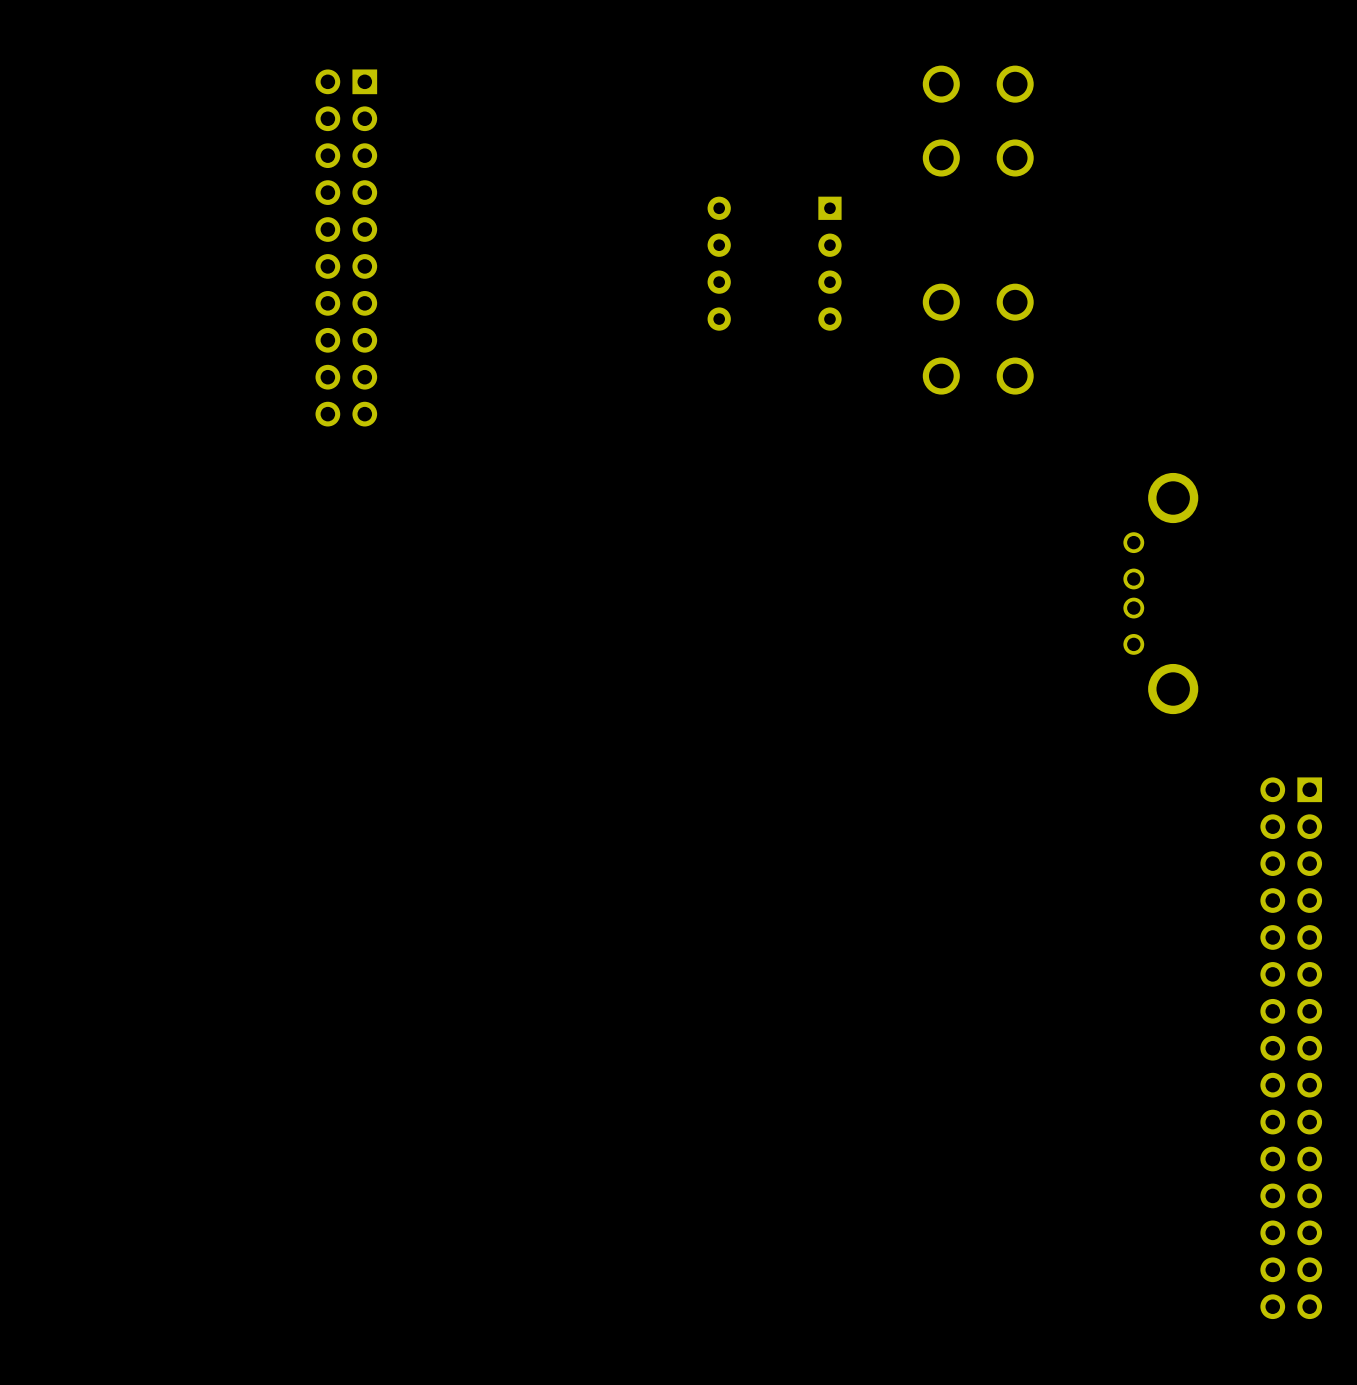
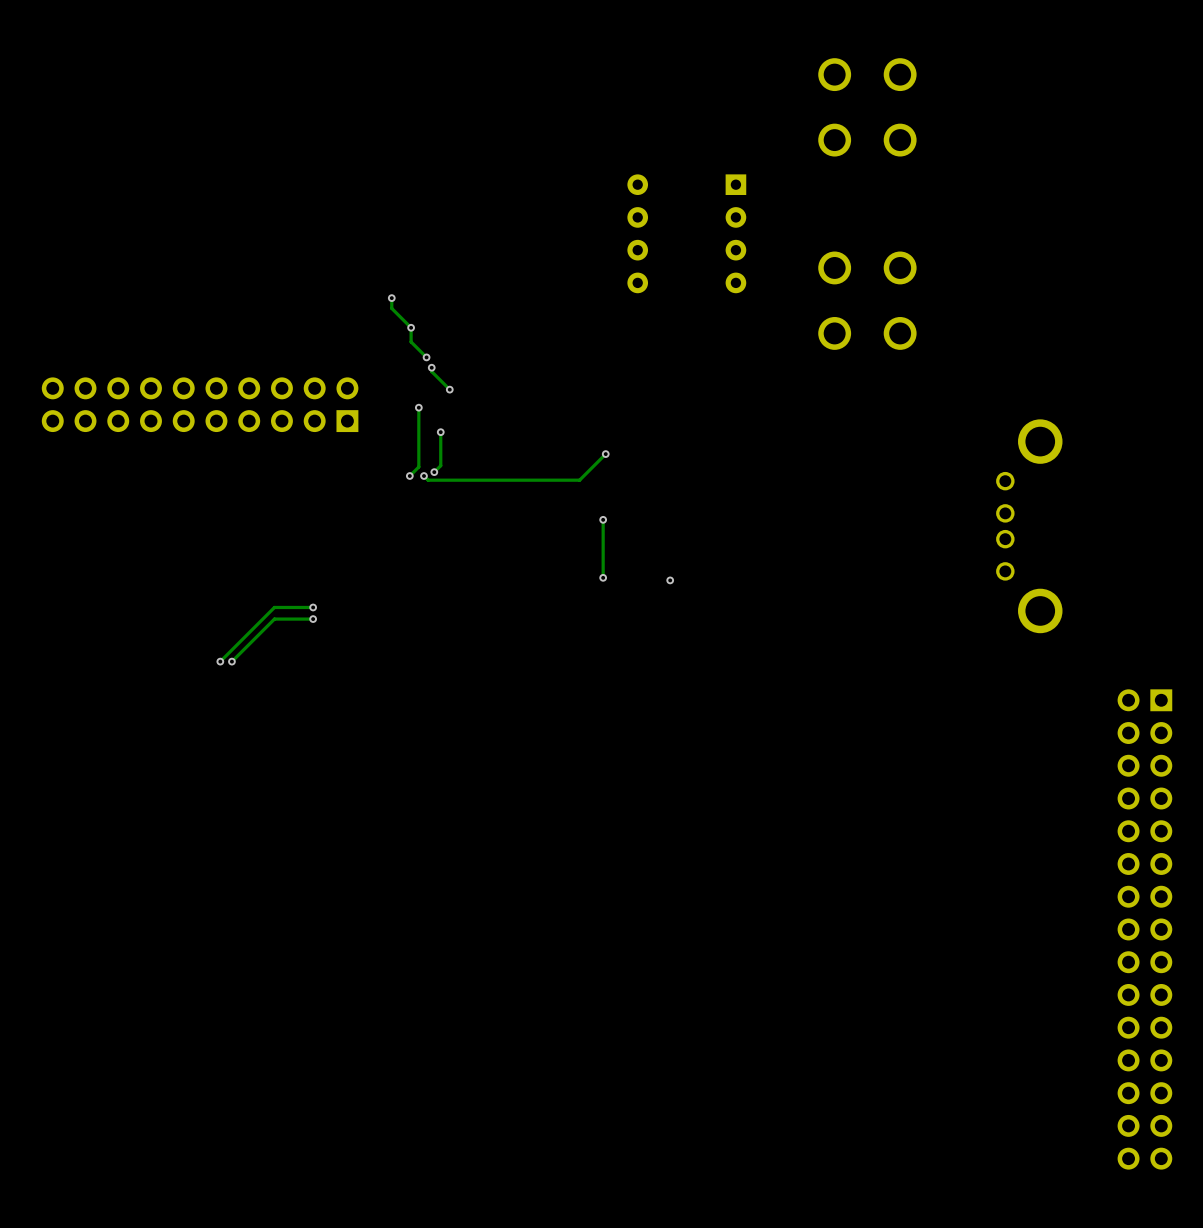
part rotation: 0° (346, 247) -> 90° clockwise (200, 404)
part position: (346, 247) -> (200, 404)
track: none -> (391, 298) (391, 308) (411, 327) (411, 341) (426, 357)
via: none -> (391, 298)
via: none -> (411, 327)
via: none -> (426, 357)
track: none -> (431, 367) (431, 371) (449, 389)
via: none -> (431, 367)
via: none -> (449, 389)
track: none -> (418, 407) (418, 466) (409, 476)
via: none -> (418, 407)
track: none -> (440, 432) (440, 465) (434, 472)
via: none -> (440, 432)
track: none -> (605, 454) (579, 480) (428, 480) (423, 476)
via: none -> (605, 454)
via: none -> (434, 472)
via: none -> (409, 476)
via: none -> (423, 476)
track: none -> (603, 519) (603, 577)
via: none -> (603, 519)
via: none -> (603, 577)
via: none -> (670, 580)
track: none -> (313, 607) (274, 607) (220, 661)
via: none -> (313, 607)
track: none -> (313, 619) (274, 619) (231, 661)
via: none -> (313, 619)
via: none -> (220, 661)
via: none -> (231, 661)

